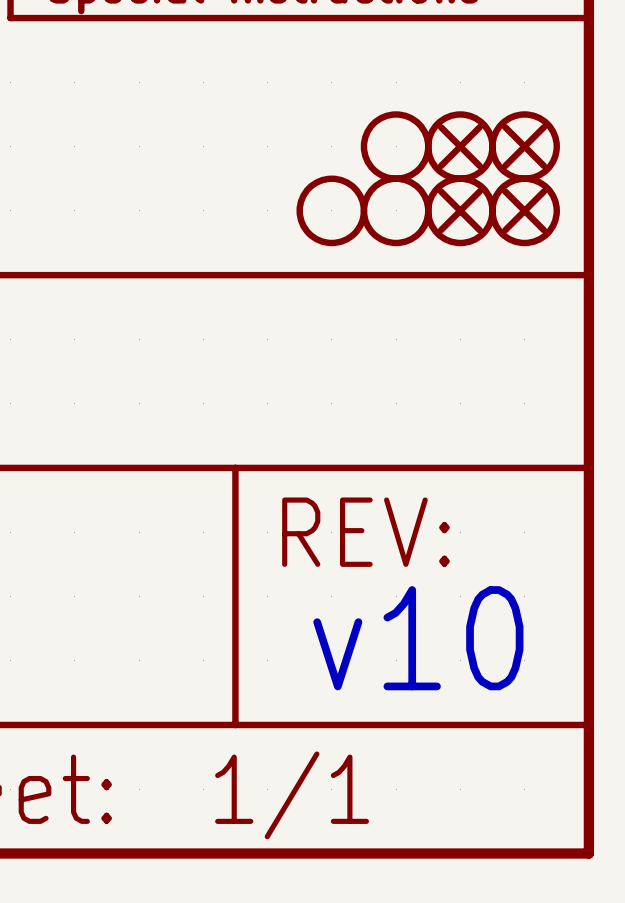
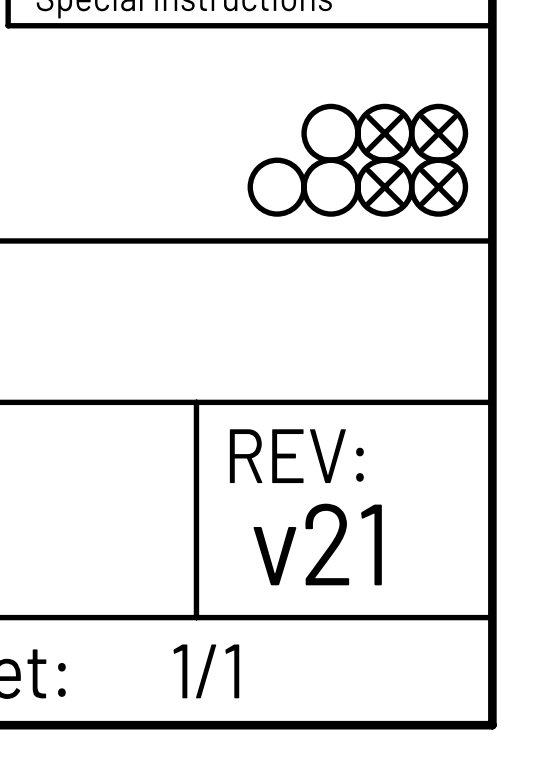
text: v10 (418, 638) -> v21 (317, 544)

